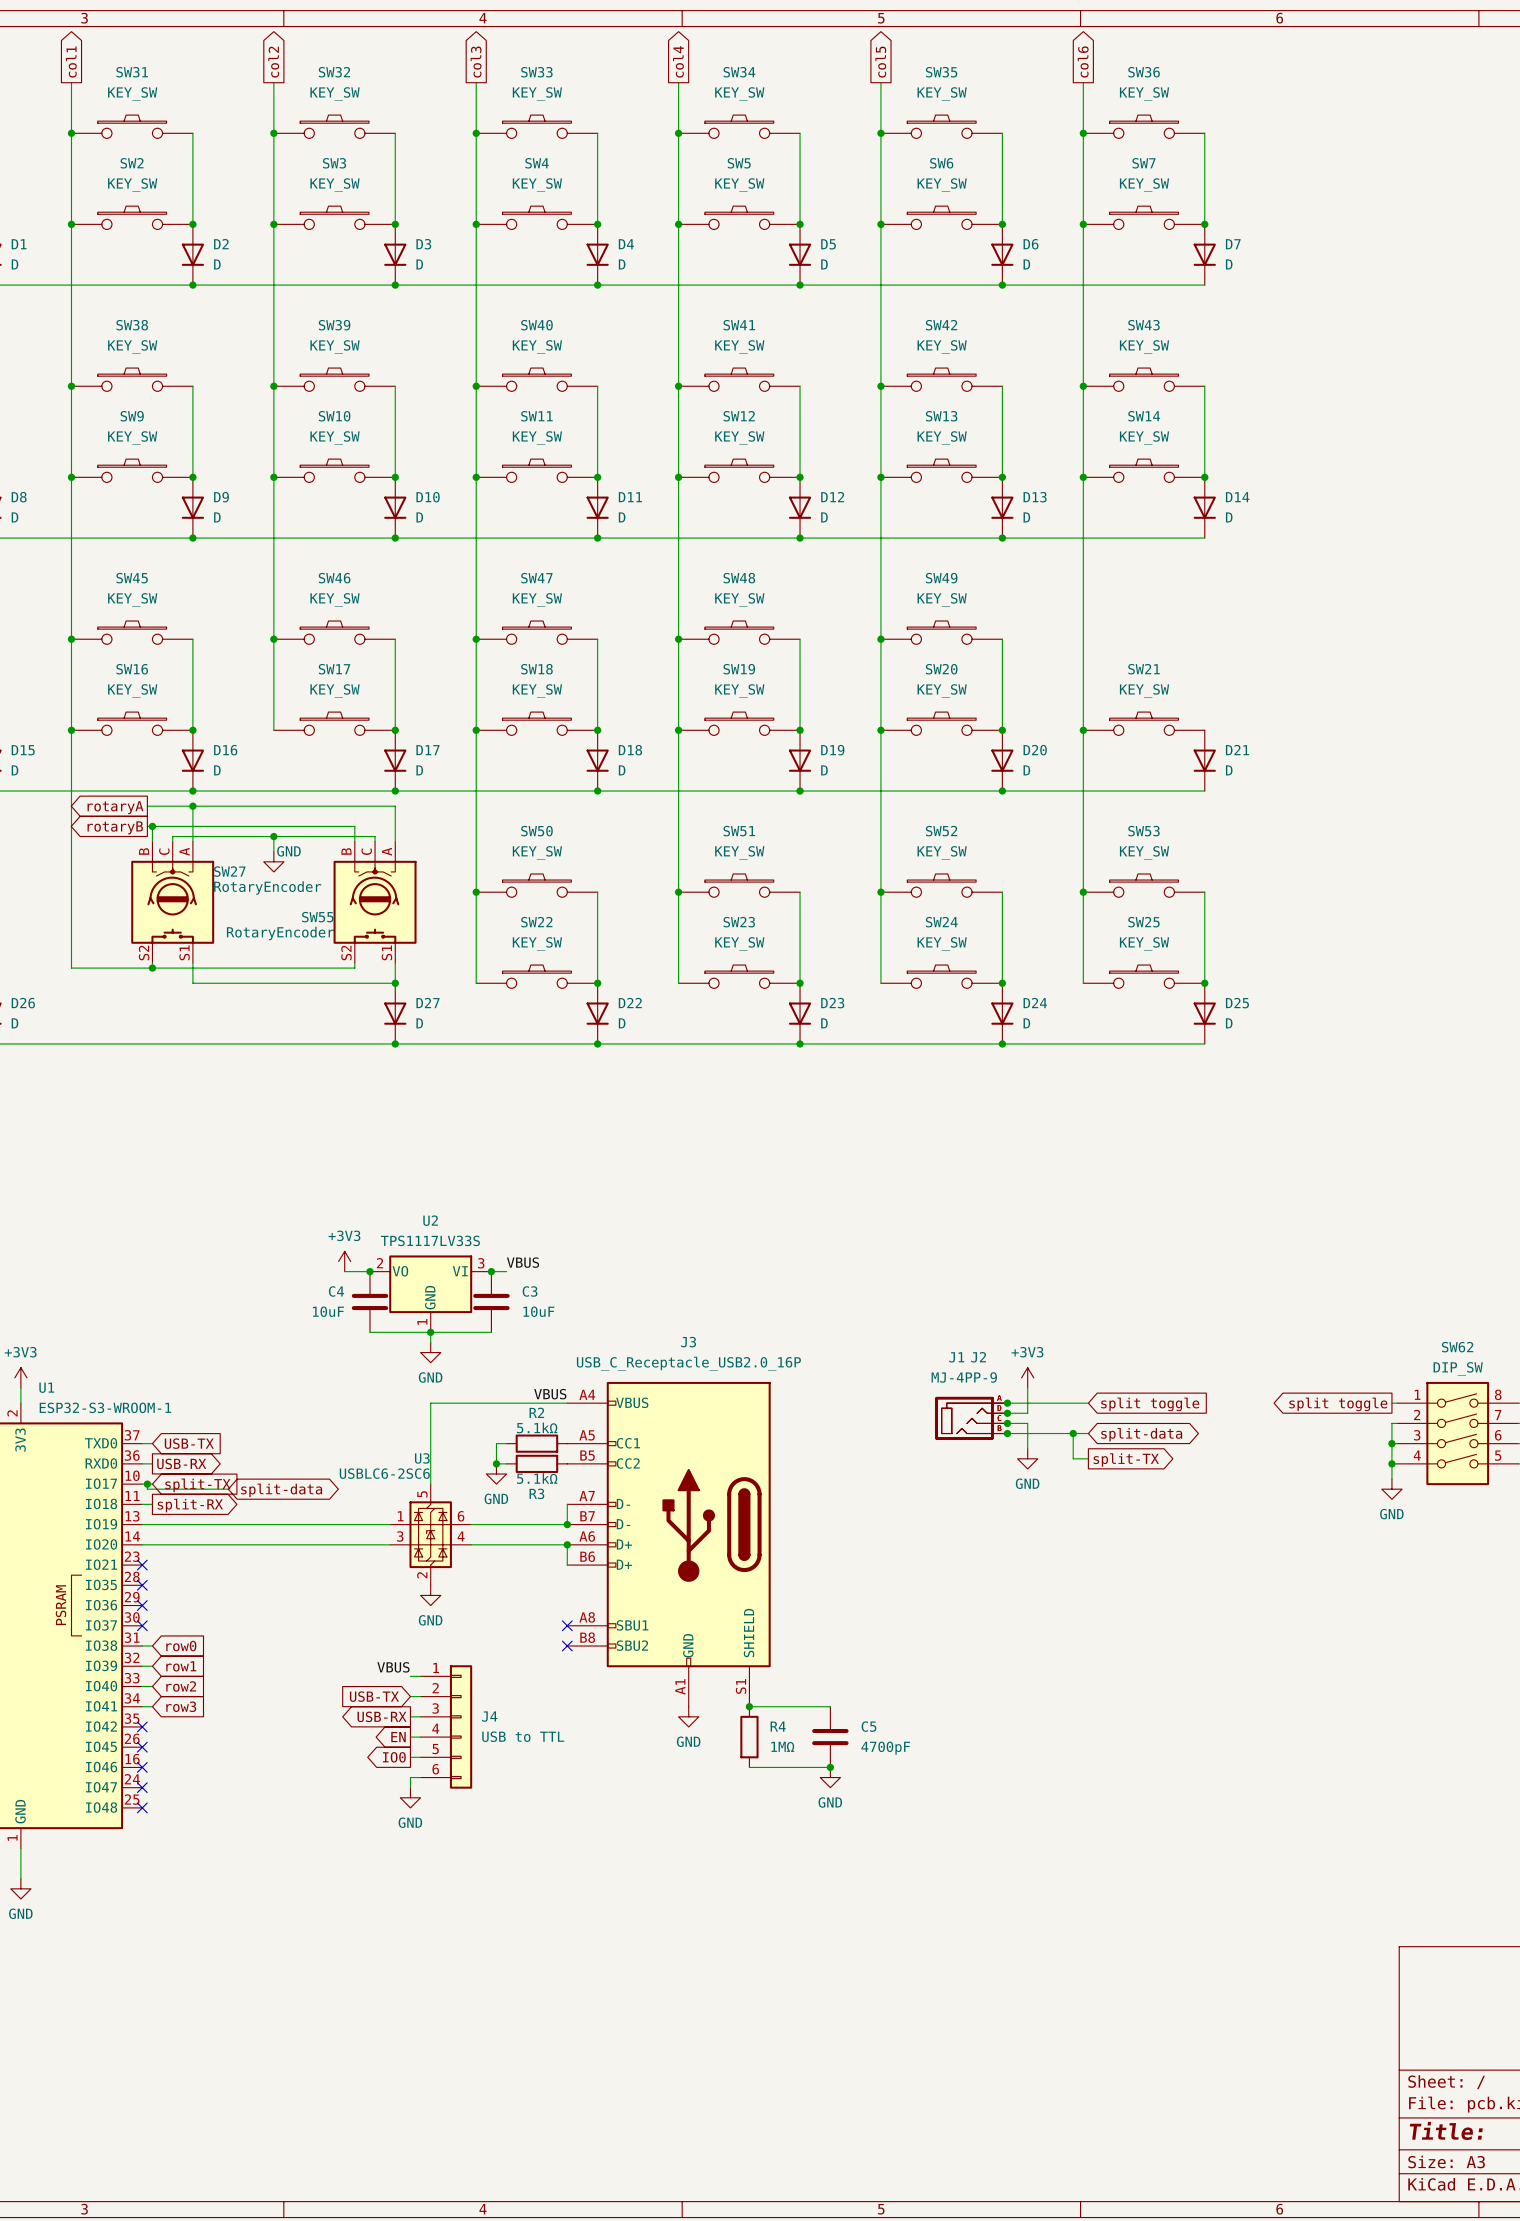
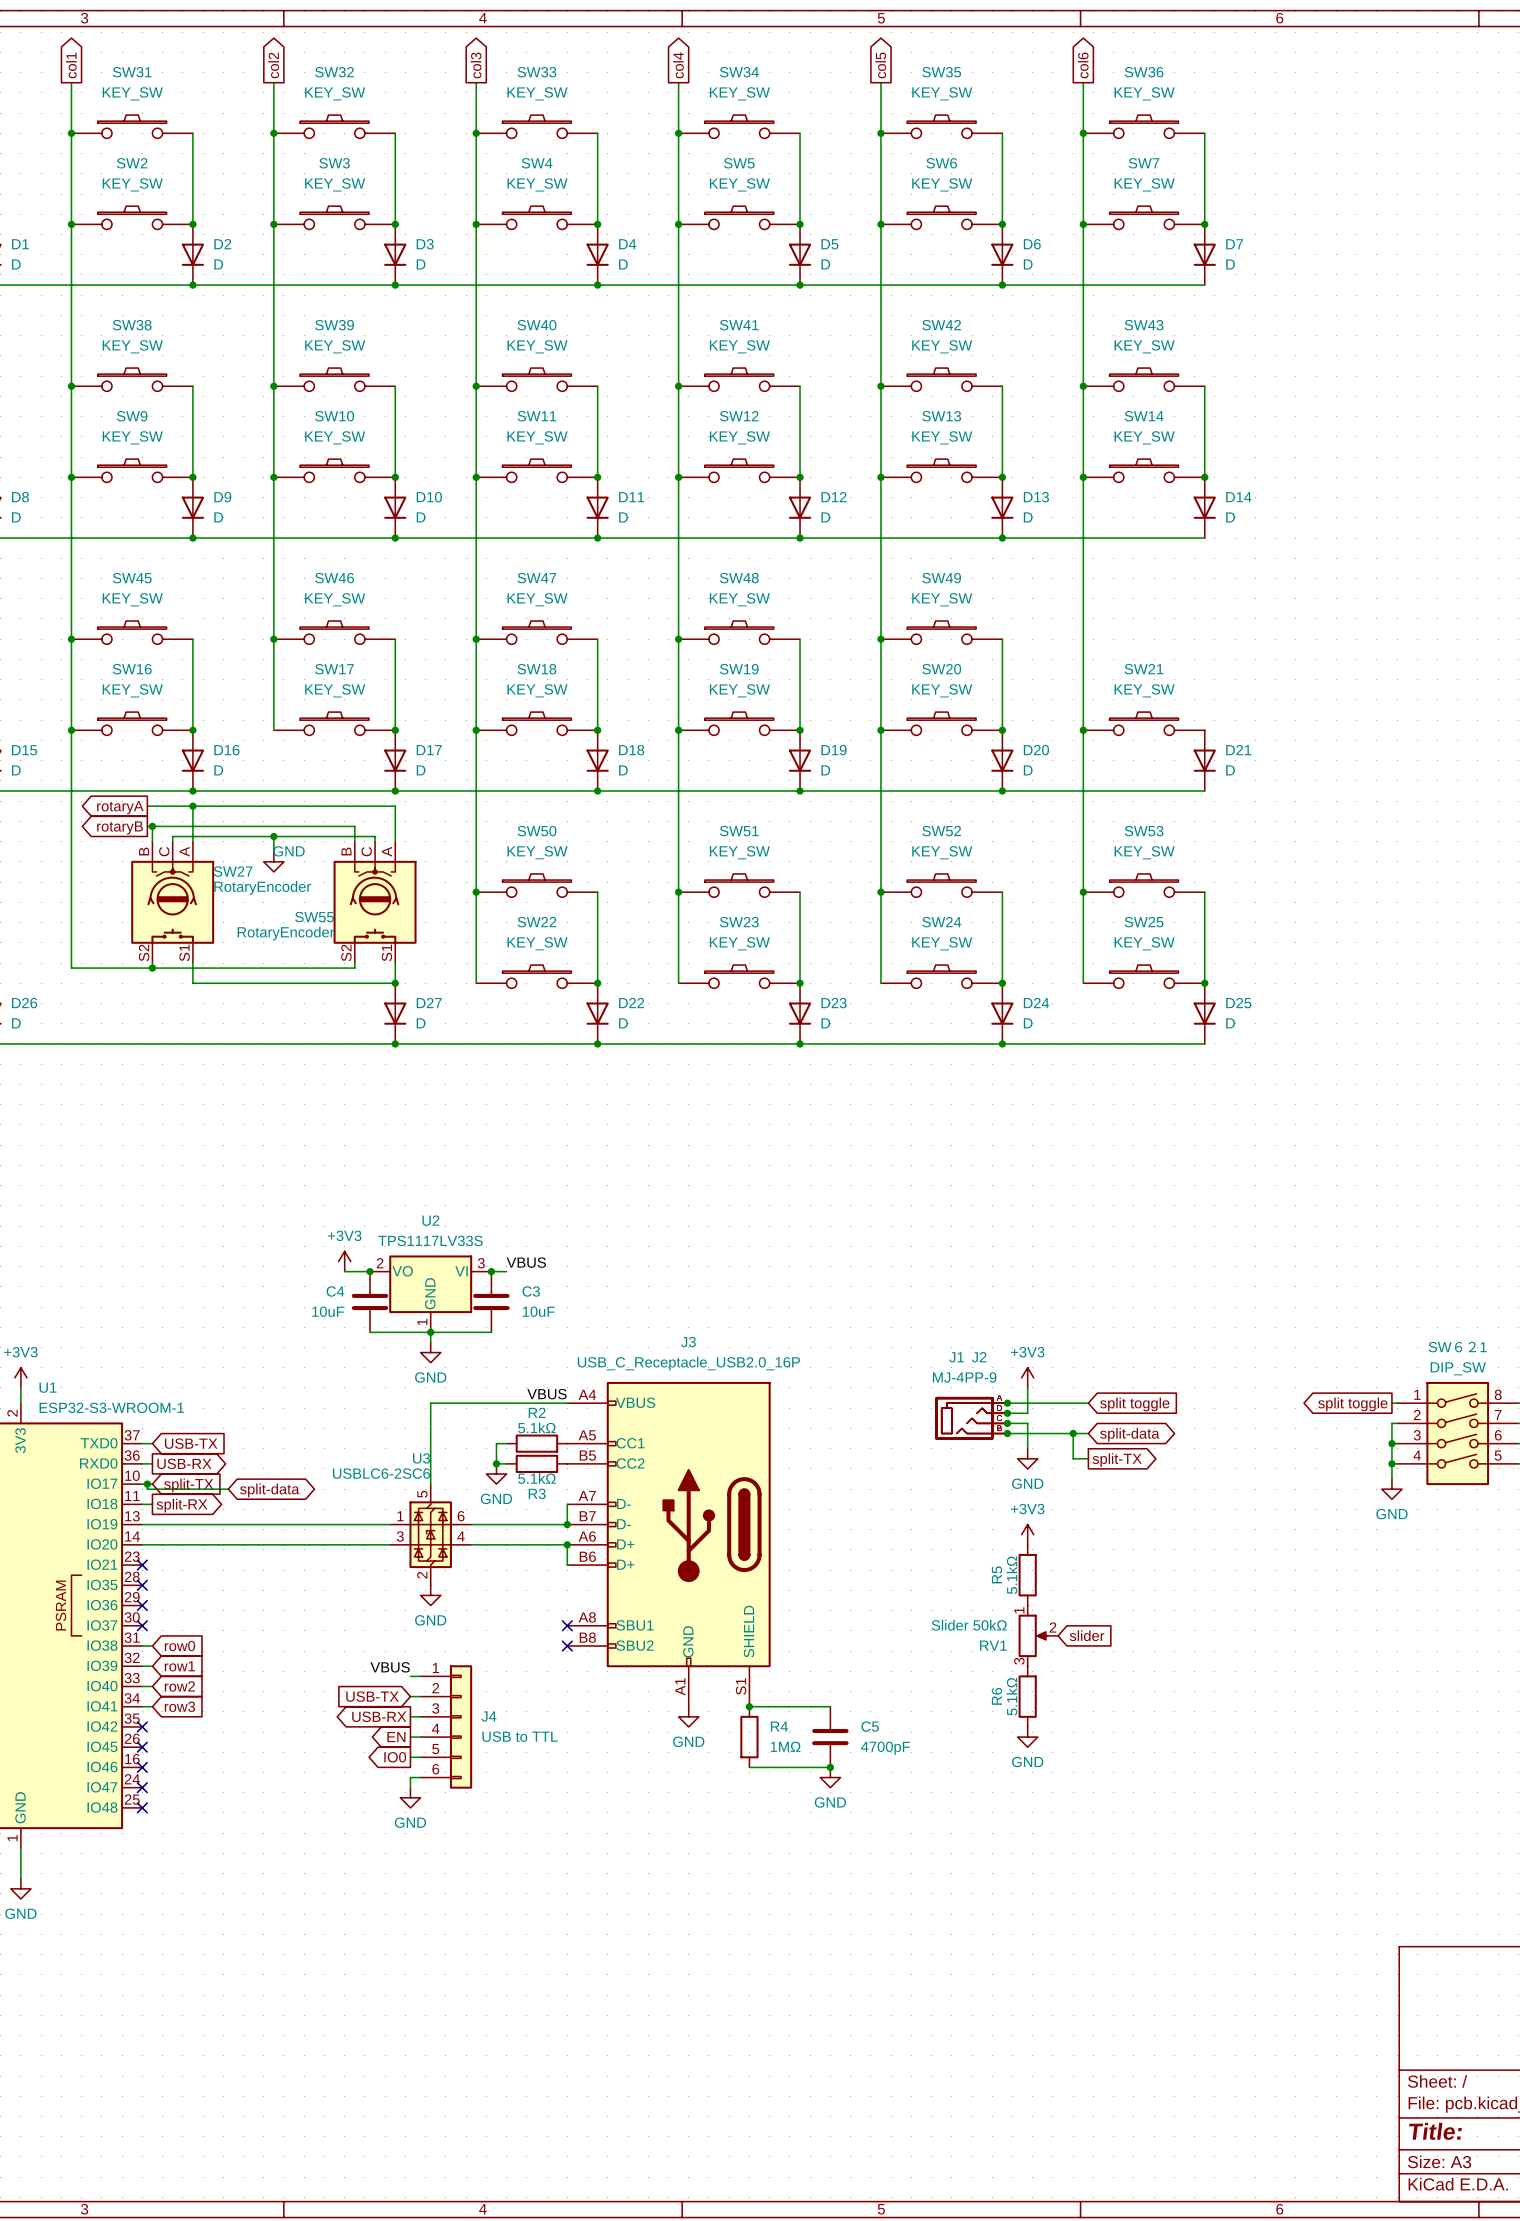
SW62 name: SW62 (1457, 1347) -> SW６２1 (1457, 1347)
power symbol: none -> +3V3 (1027, 1534)
R5: none -> 5.1kΩ (1027, 1575)
RV1: none -> Slider 50kΩ (1038, 1635)
global label: none -> slider (1087, 1635)
R6: none -> 5.1kΩ (1027, 1696)
power symbol: none -> GND (1027, 1737)

